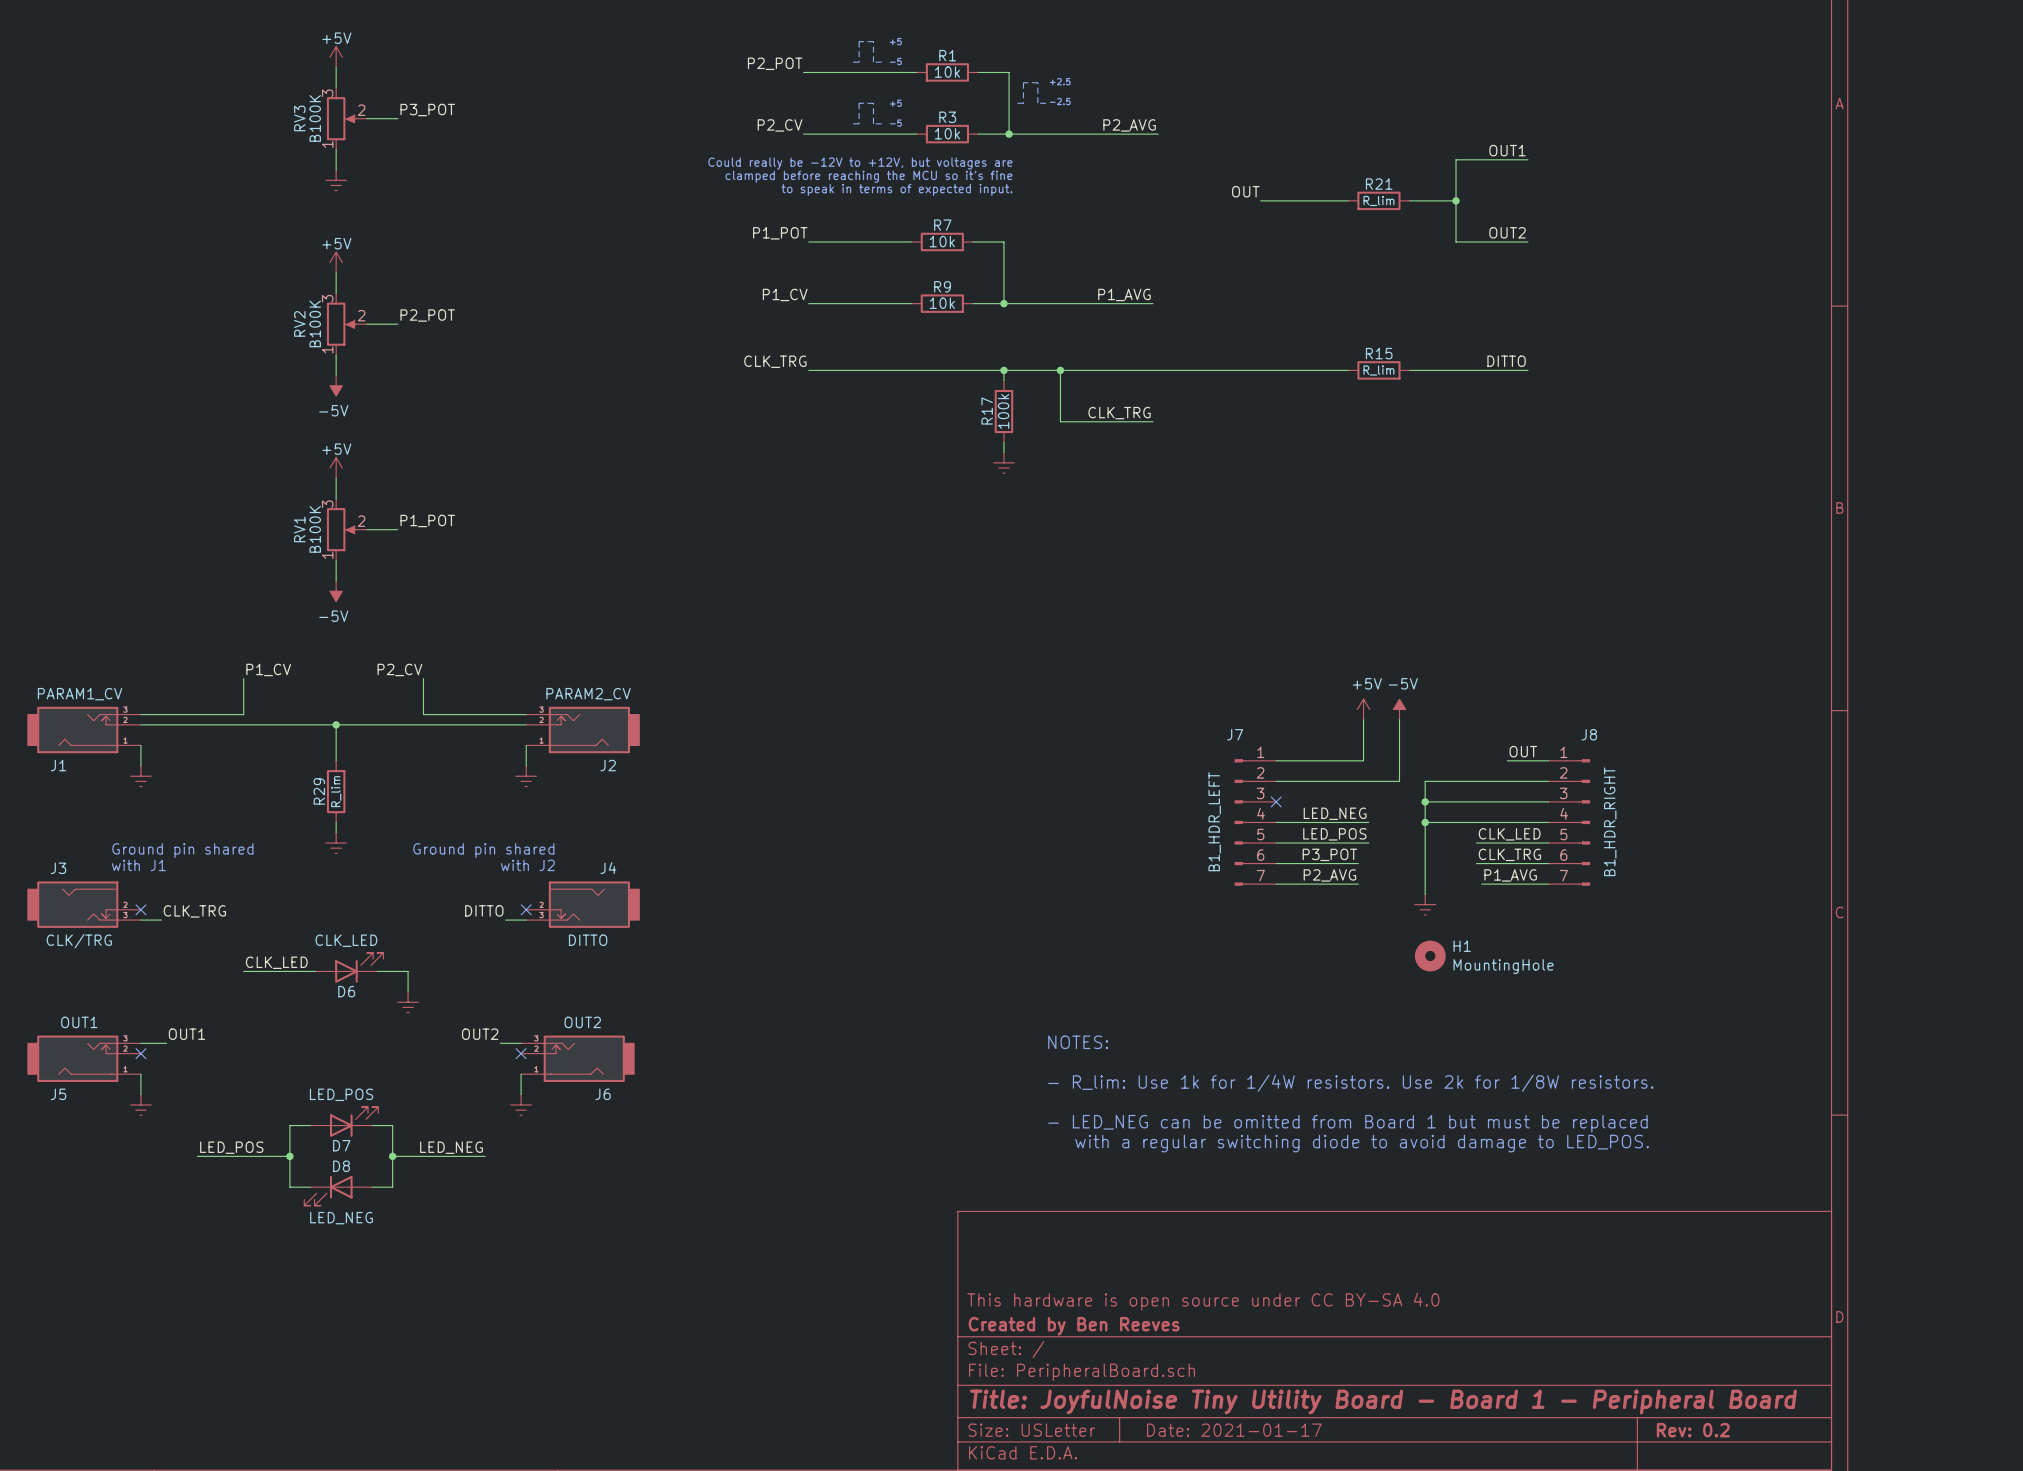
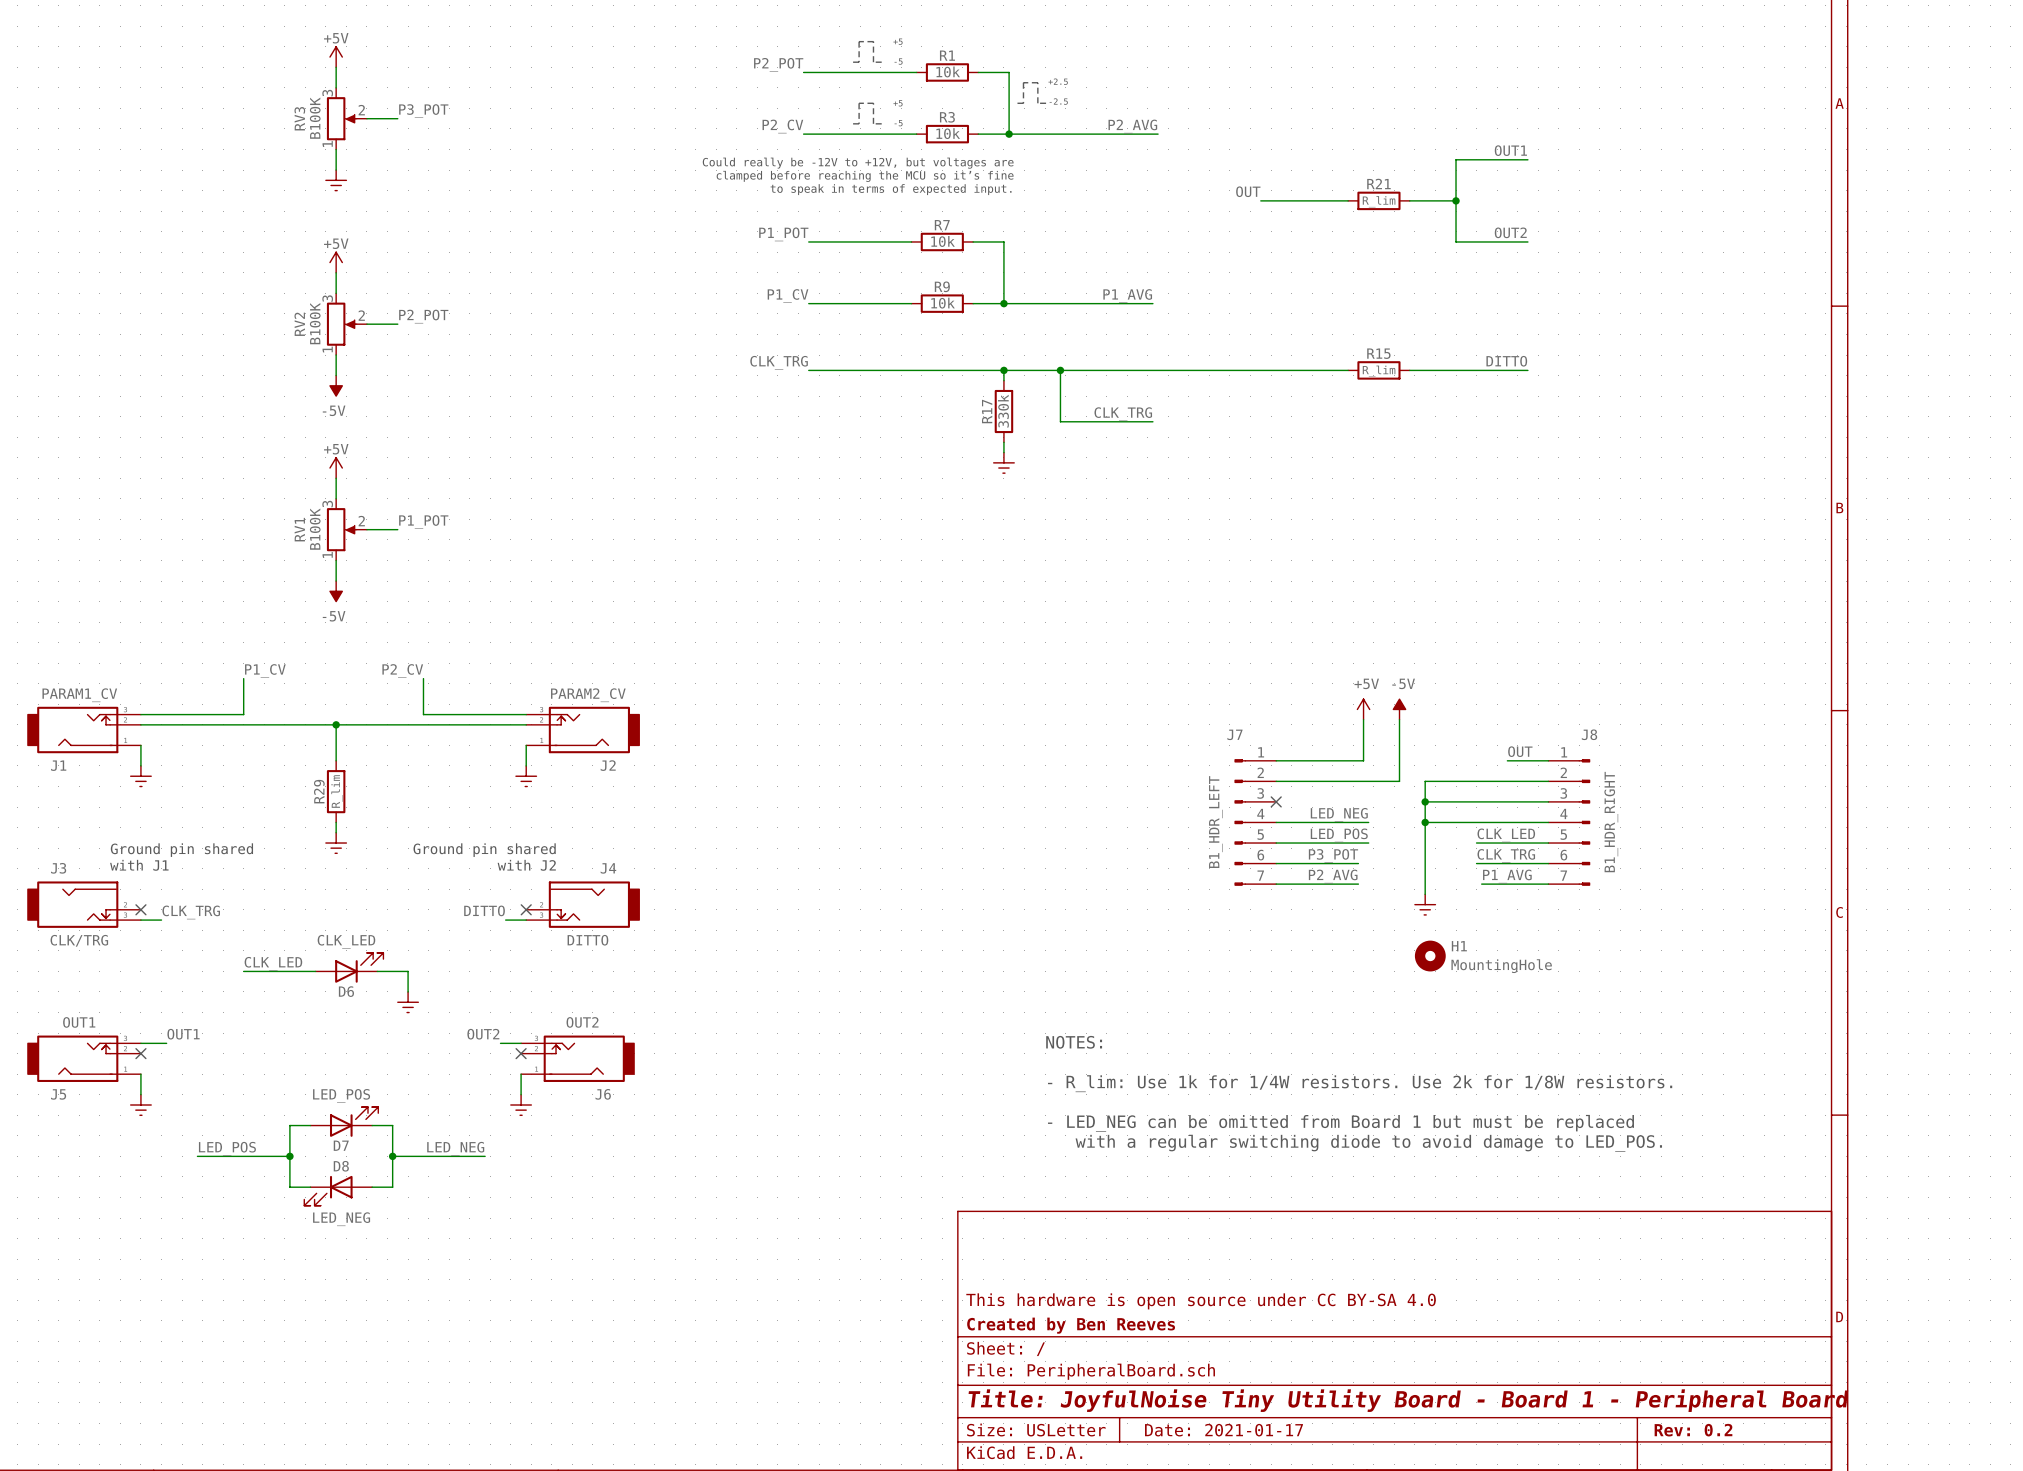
R17 value: 100k (1003, 411) -> 330k (1003, 411)

